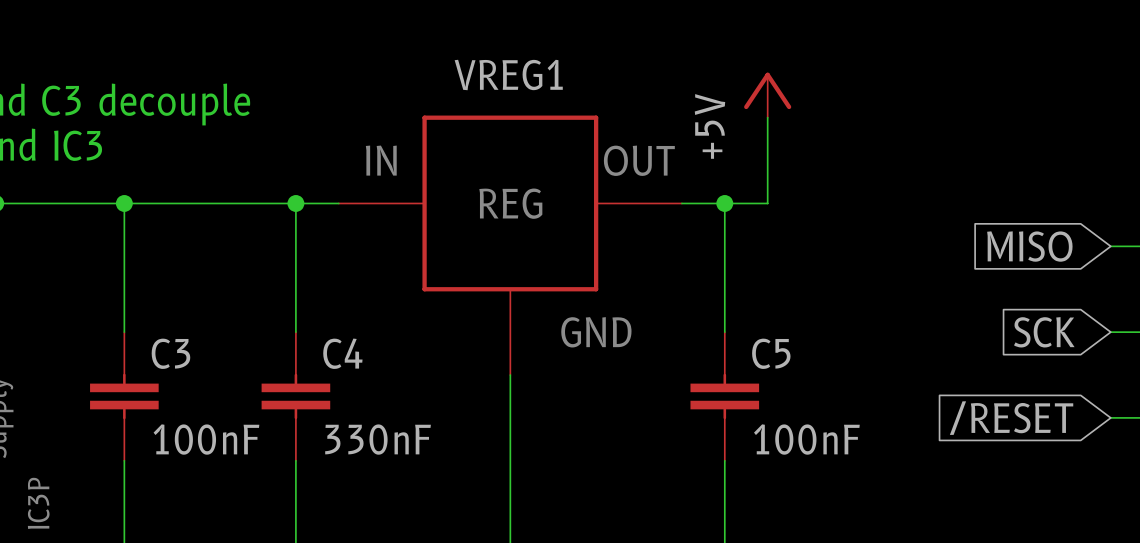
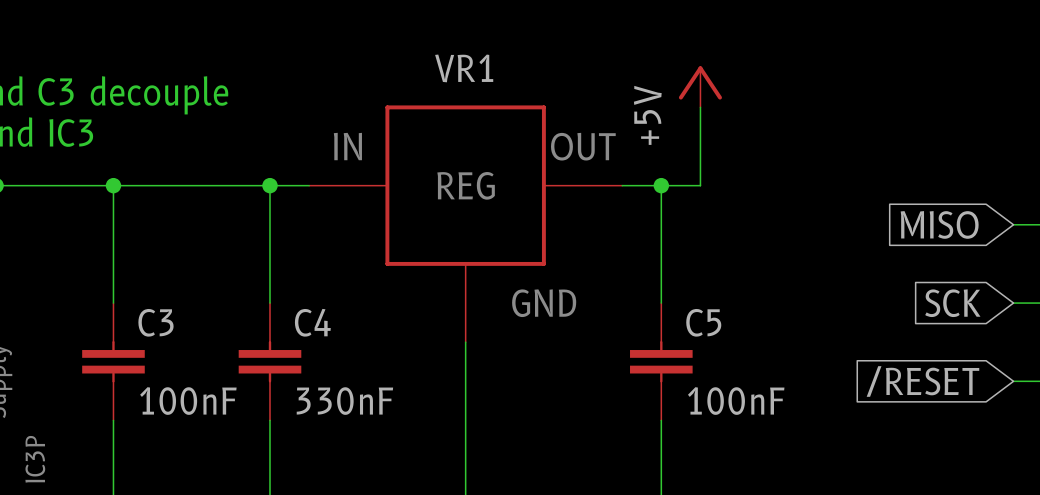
VREG1 name: VREG1 (508, 75) -> VR1 (464, 68)

